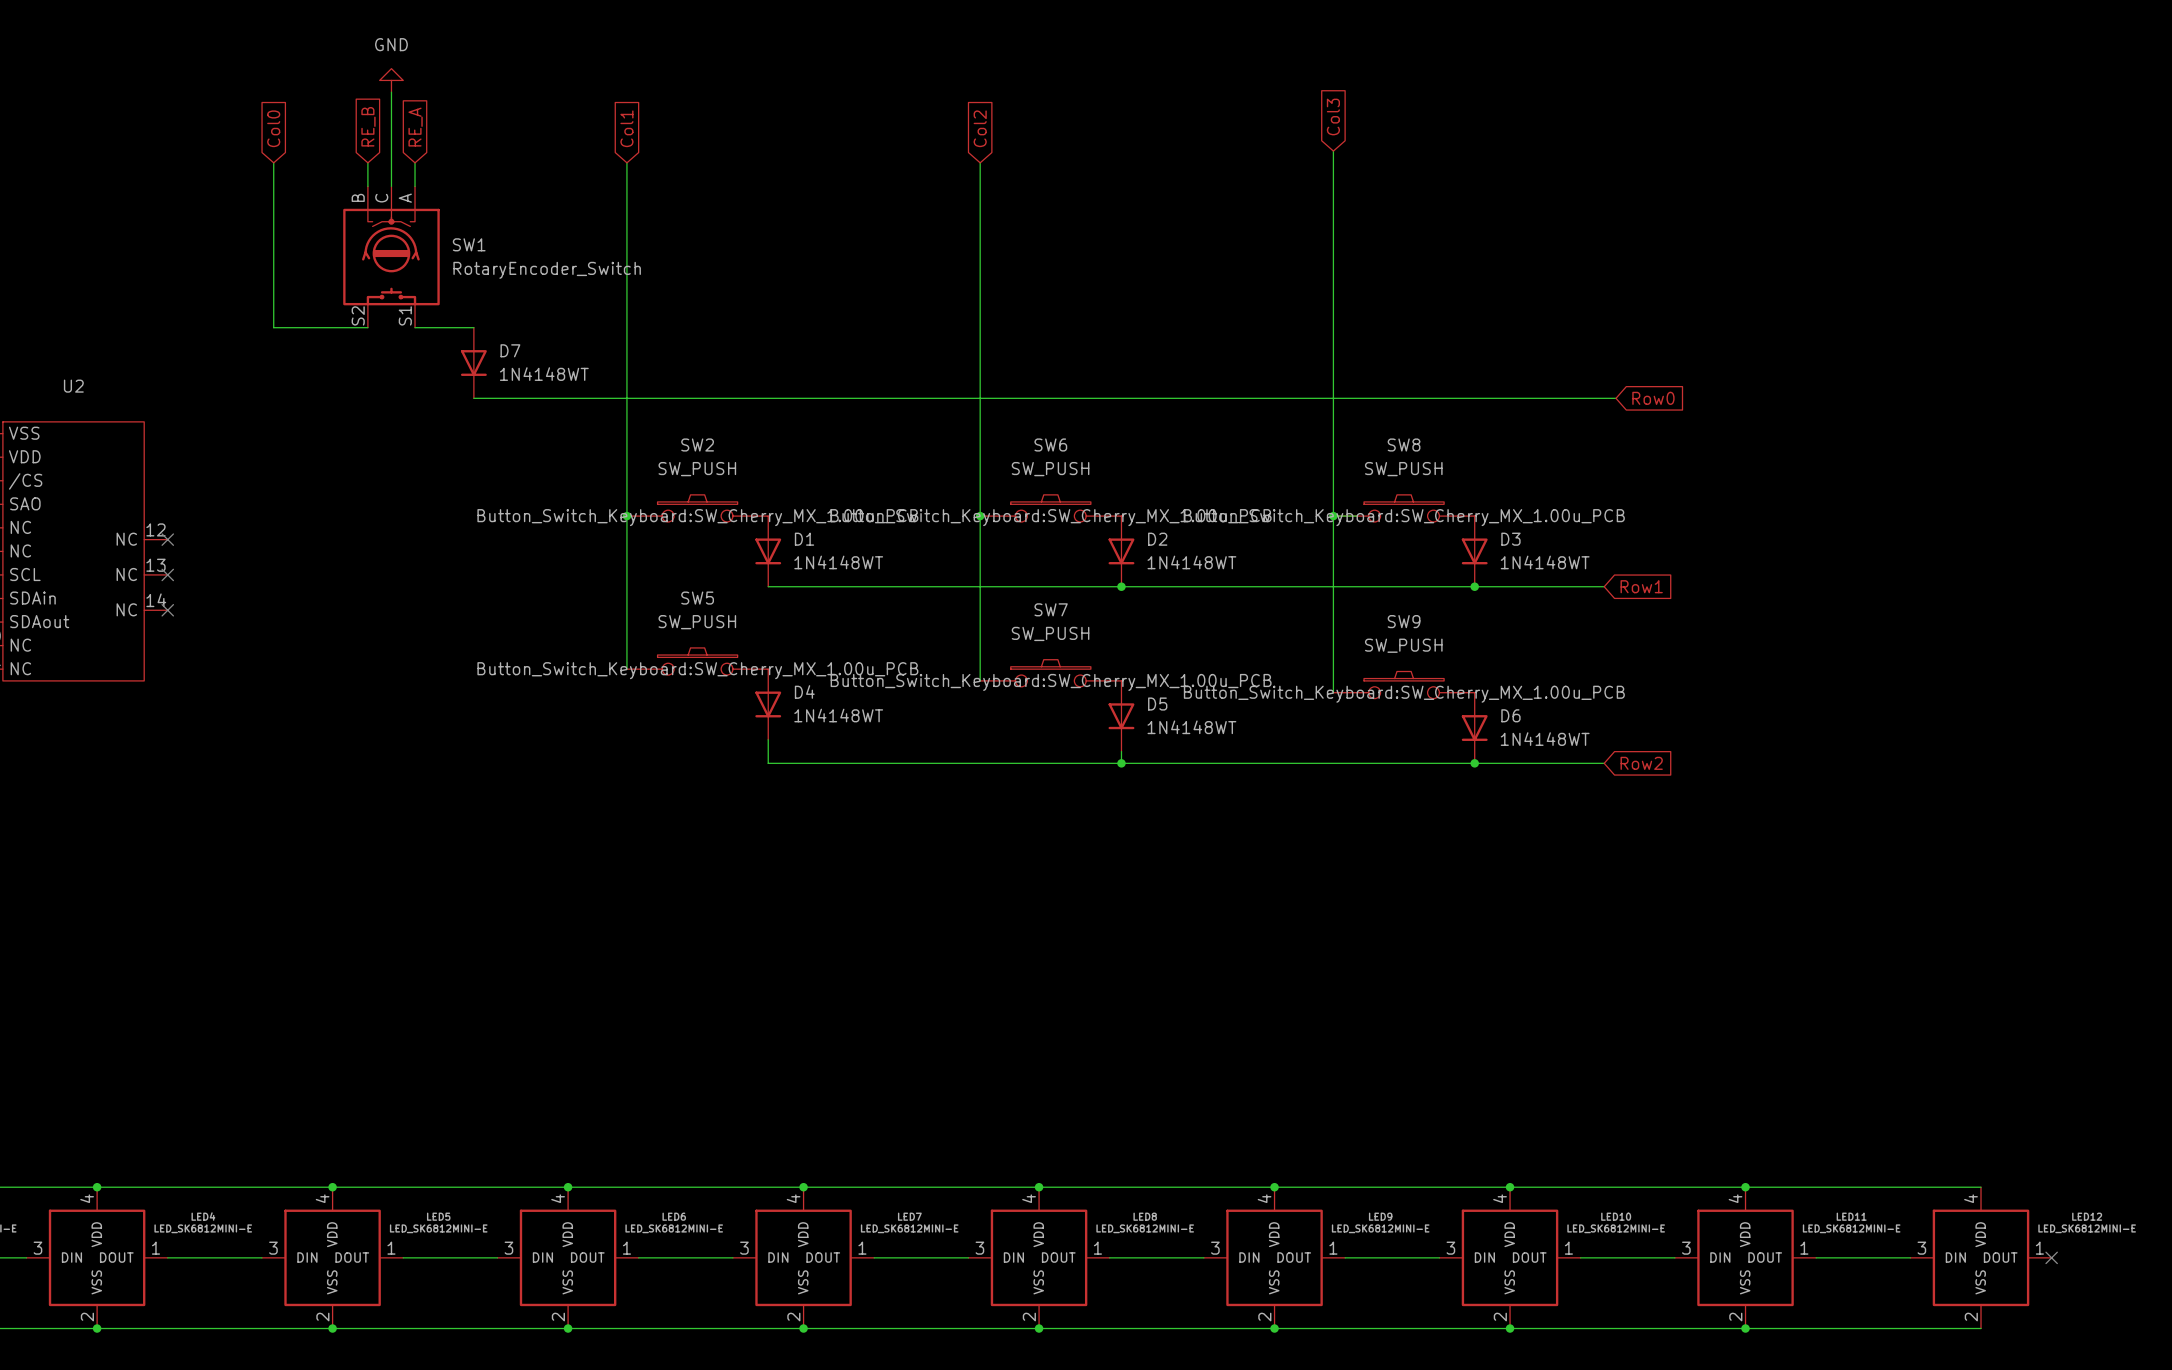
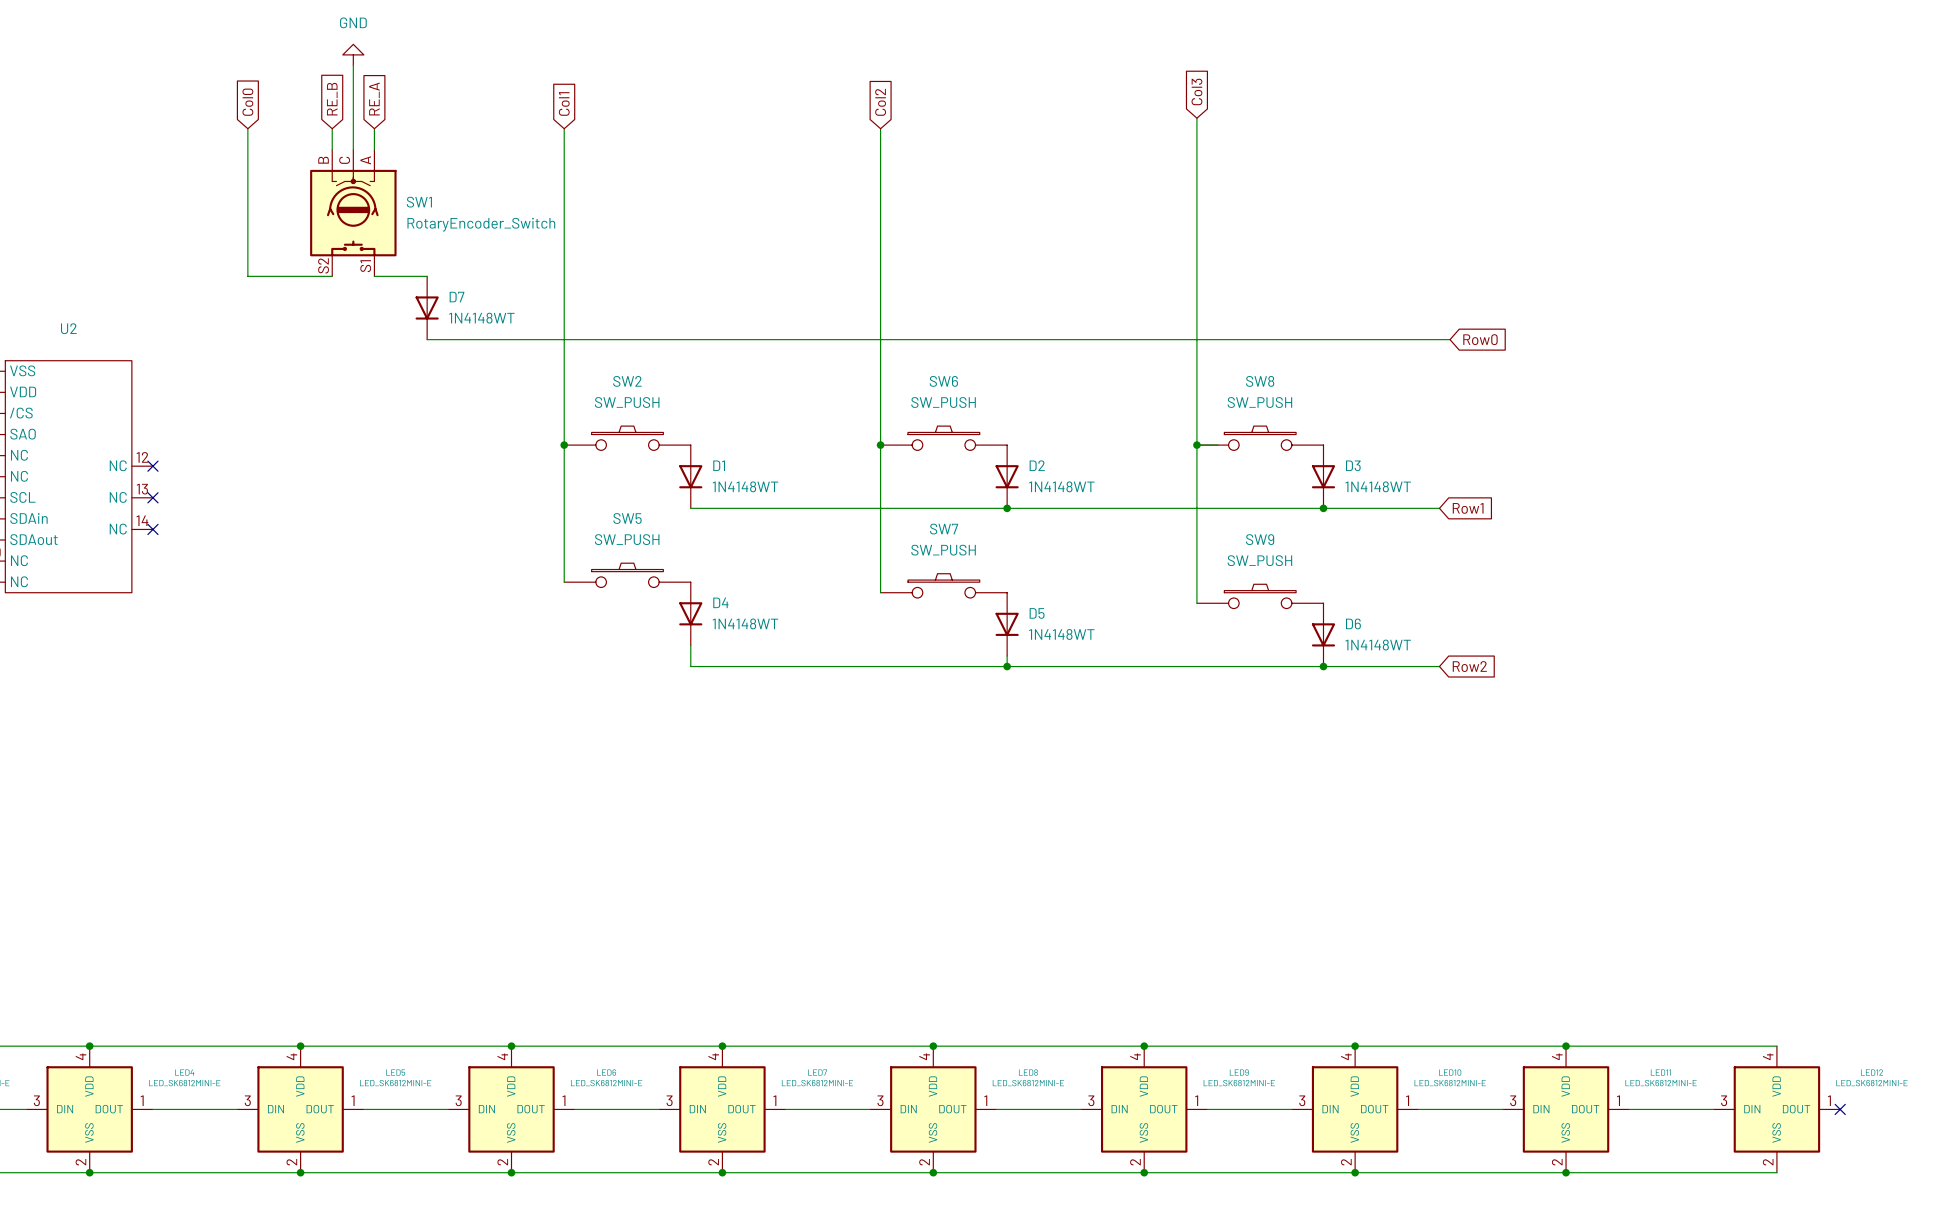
SW2 text: Button_Switch_Keyboard:SW_Cherry_MX_1.00u_PCB (697, 517) -> none
SW6 text: Button_Switch_Keyboard:SW_Cherry_MX_1.00u_PCB (1051, 517) -> none
SW8 text: Button_Switch_Keyboard:SW_Cherry_MX_1.00u_PCB (1404, 517) -> none
SW5 text: Button_Switch_Keyboard:SW_Cherry_MX_1.00u_PCB (697, 670) -> none
SW7 text: Button_Switch_Keyboard:SW_Cherry_MX_1.00u_PCB (1051, 682) -> none
SW9 text: Button_Switch_Keyboard:SW_Cherry_MX_1.00u_PCB (1404, 694) -> none

